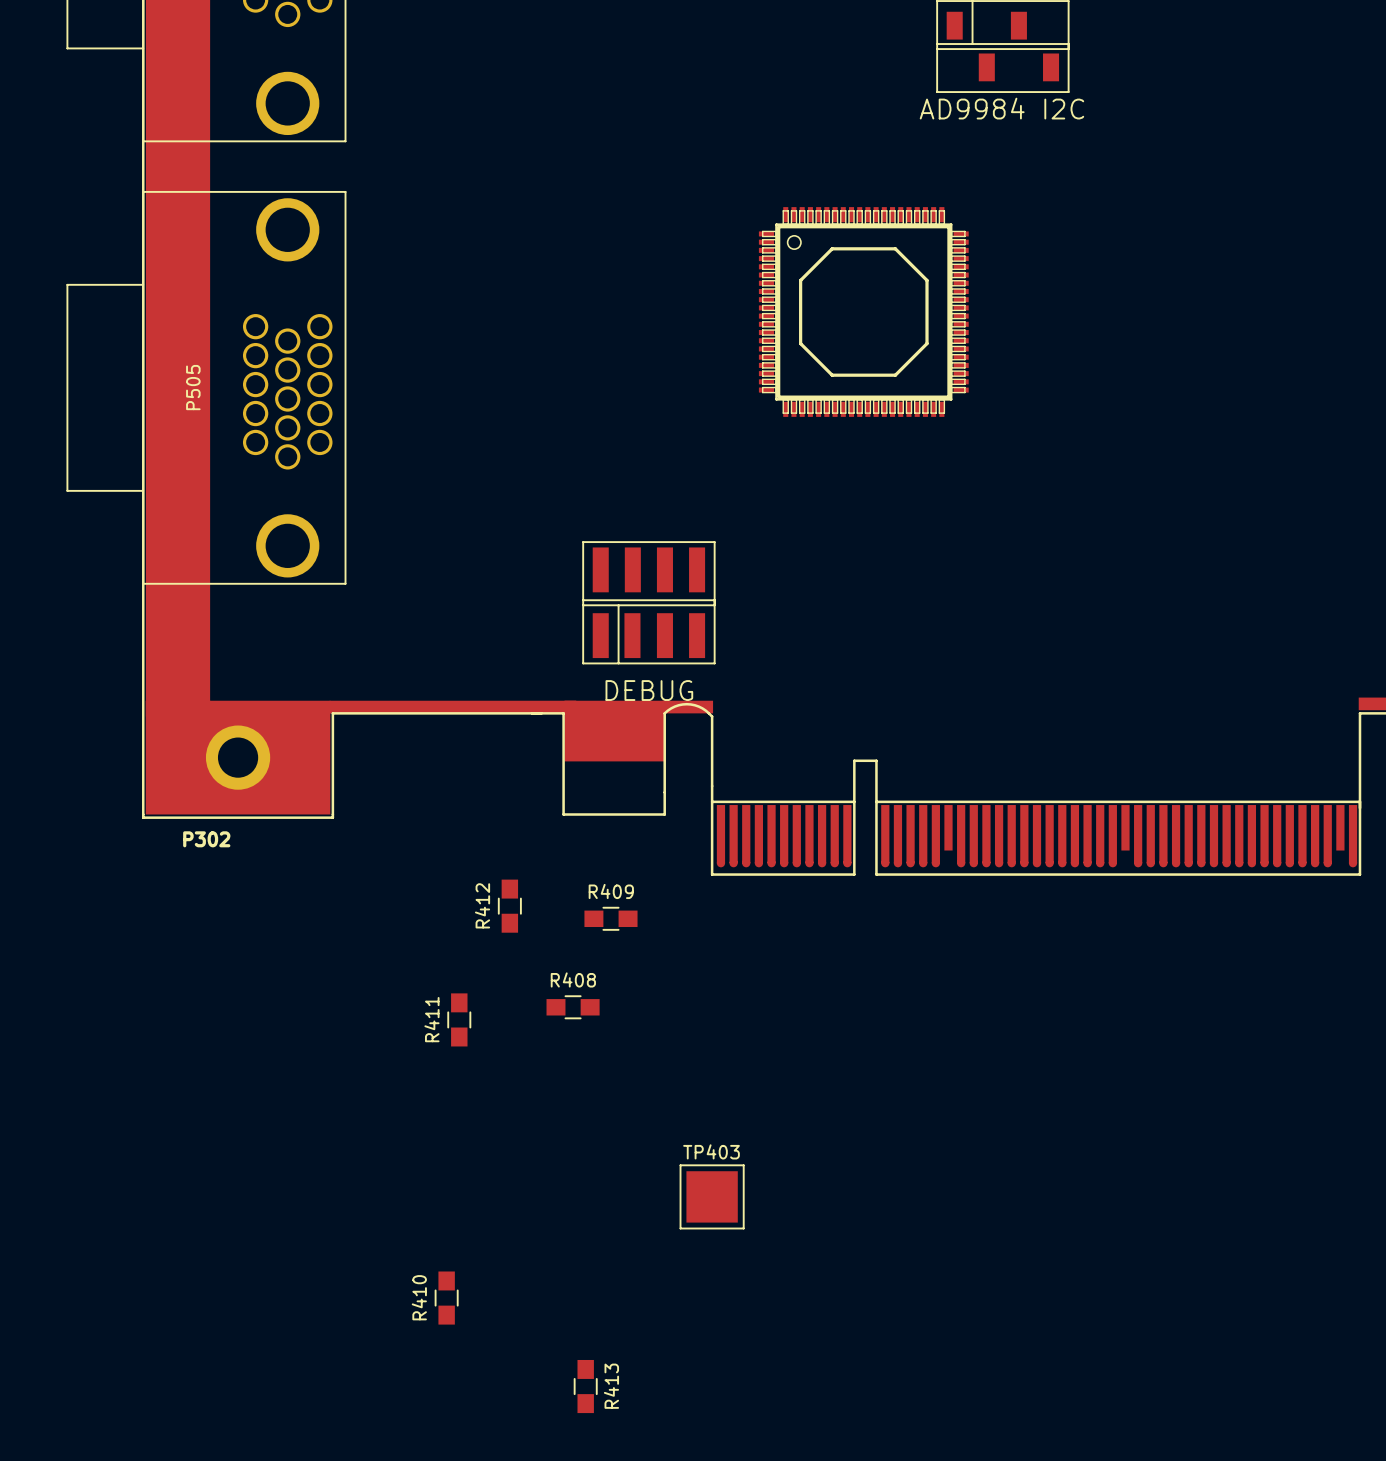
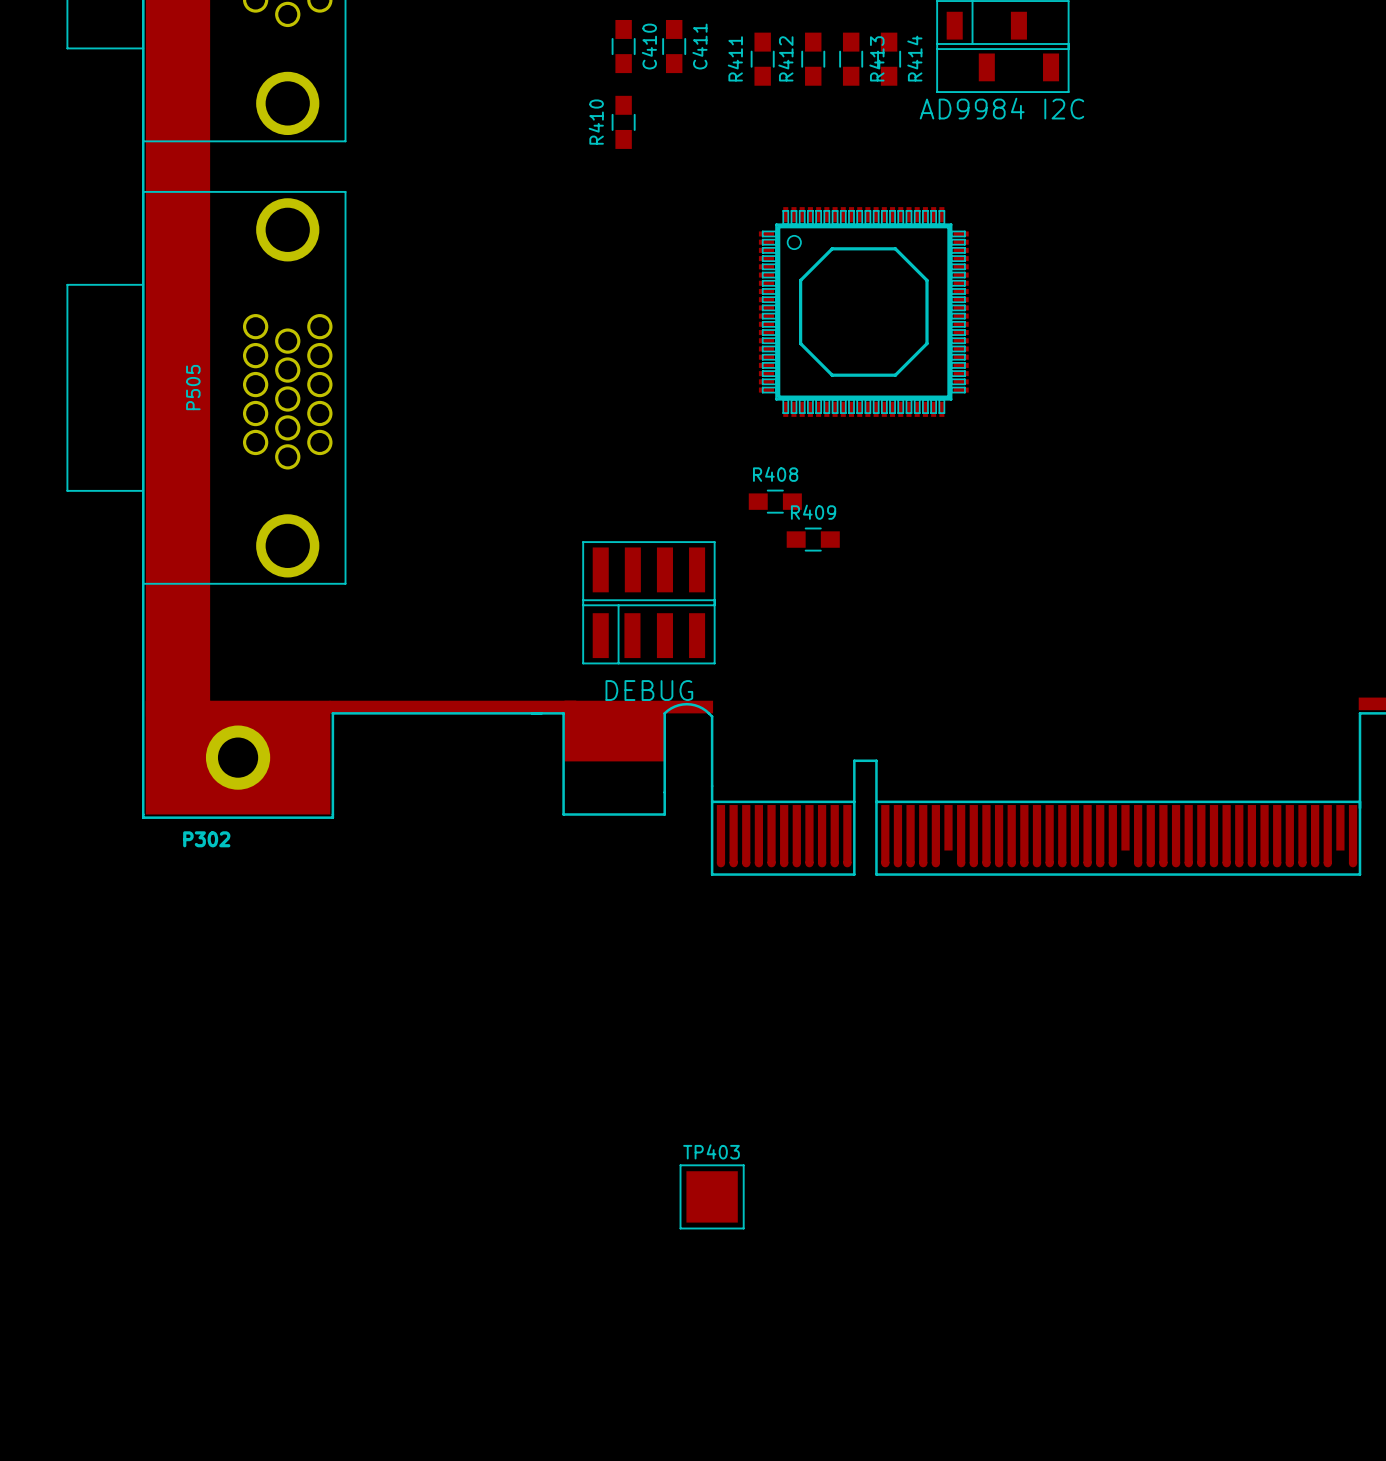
C410: none -> (623, 46)
C411: none -> (674, 46)
R414: none -> (889, 59)
R412 position: (509, 906) -> (813, 59)
R409 position: (610, 918) -> (813, 539)
R408 position: (573, 1007) -> (775, 501)
R411 position: (459, 1019) -> (762, 59)
R410 position: (446, 1298) -> (623, 122)
R413 position: (585, 1386) -> (851, 59)

